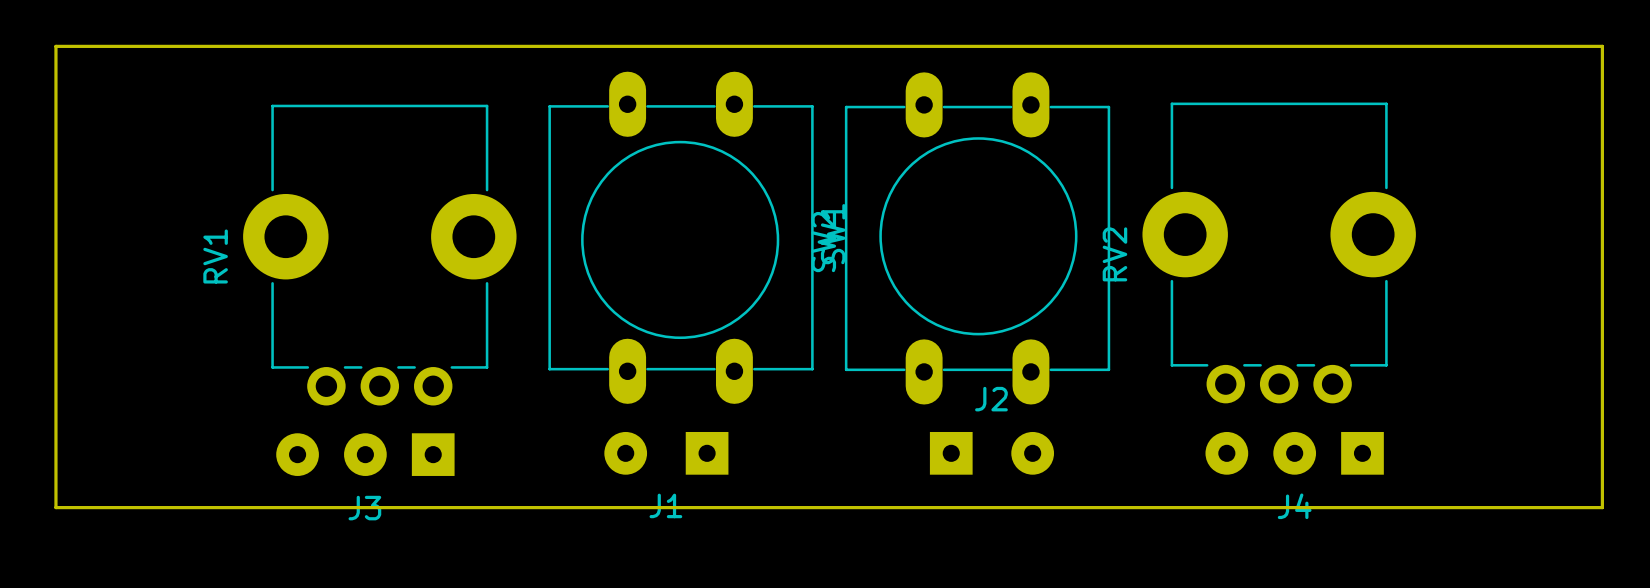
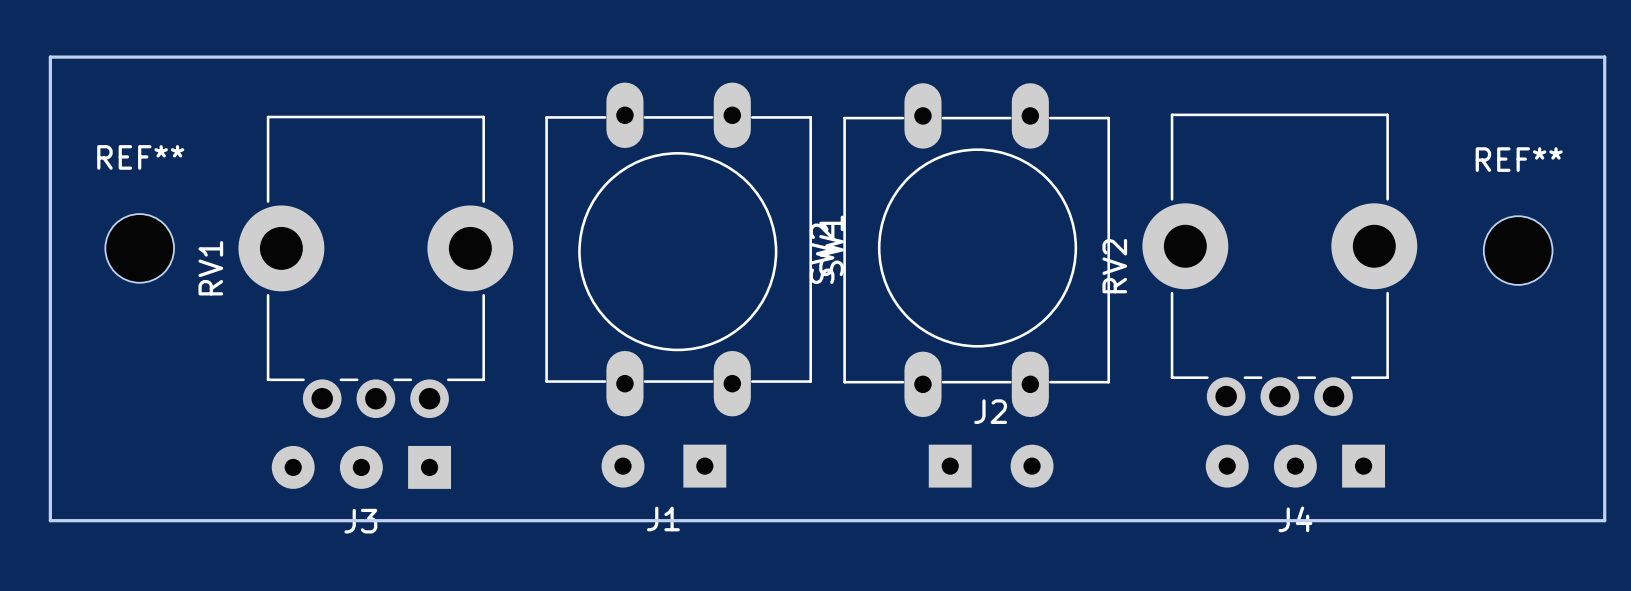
REF**: none -> (139, 248)
REF**: none -> (1518, 250)

